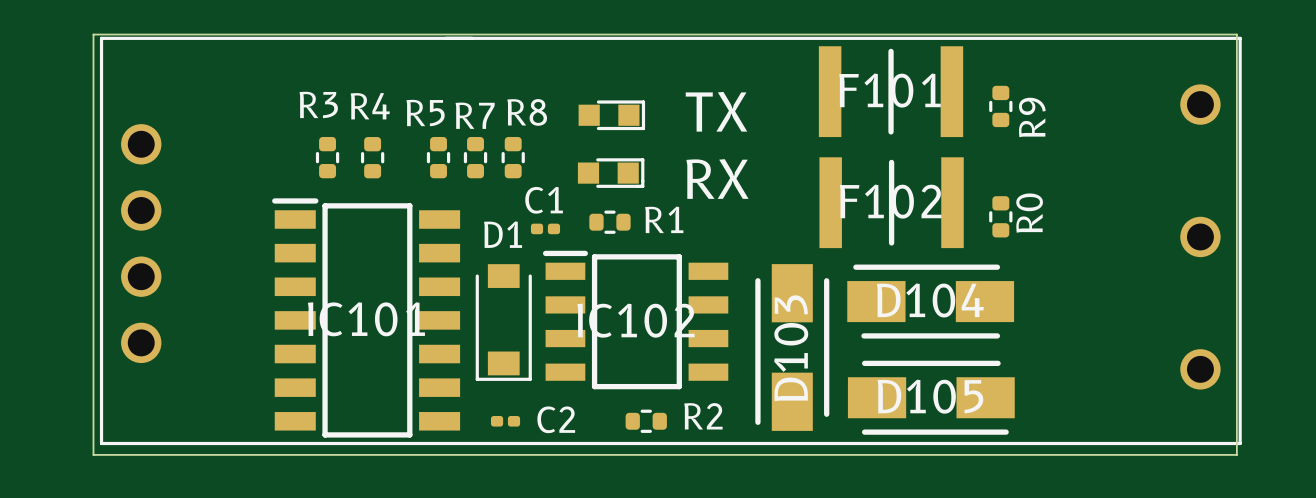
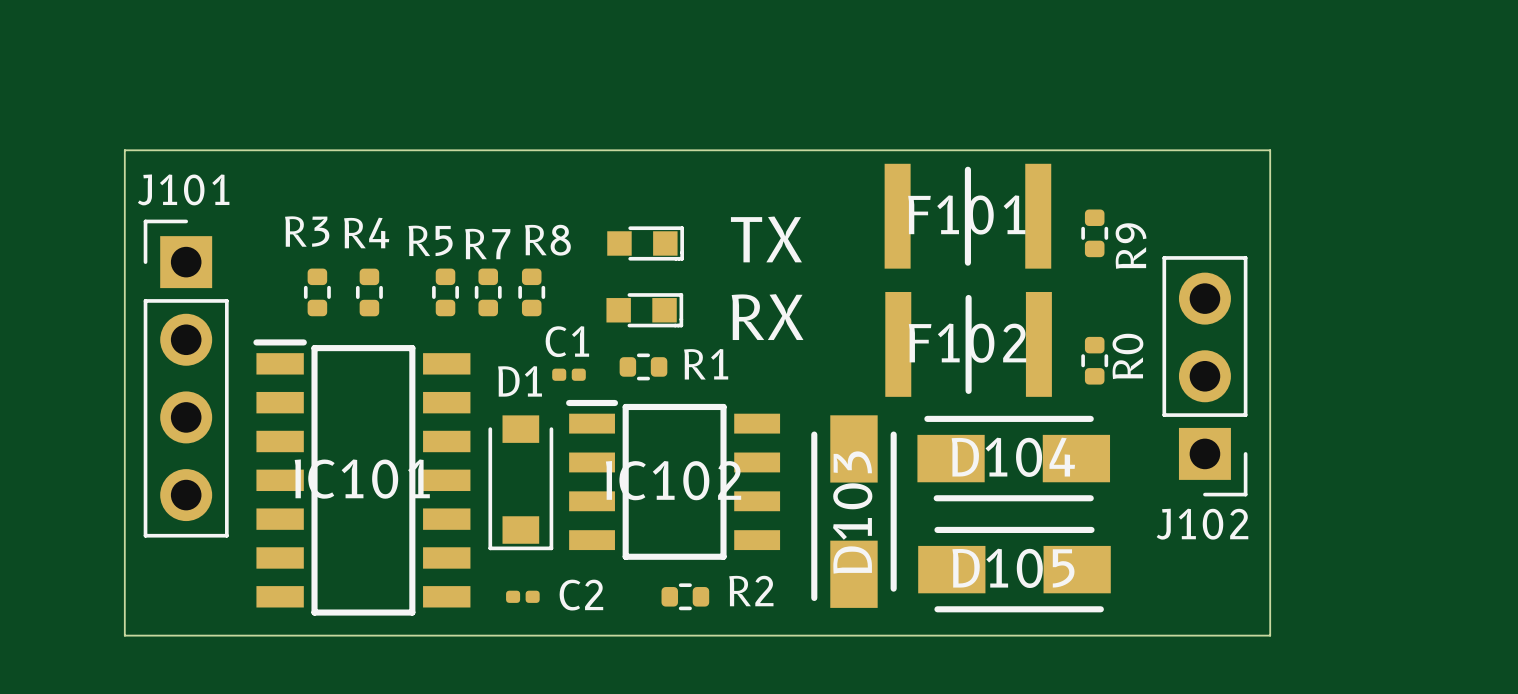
board edge: (160, 34) (93, 34) (93, 454) (160, 454) -> (124, 150) (124, 635)
board edge: (1152, 34) (1236, 34) (1236, 454) (1152, 454) -> (1270, 150) (1270, 635)
J102: none -> (1204, 376)
J101: none -> (186, 378)
part: (670, 240) -> none

